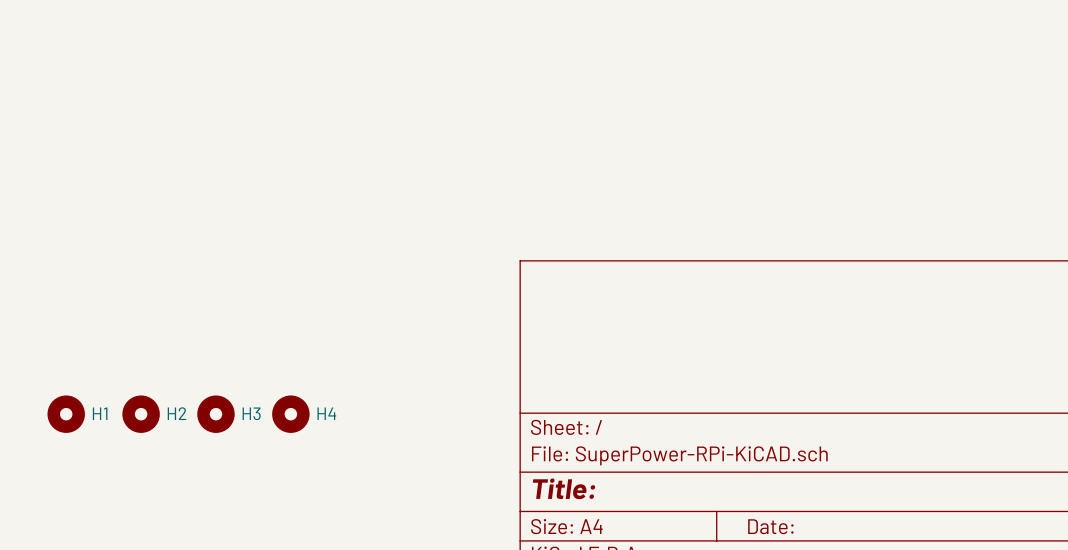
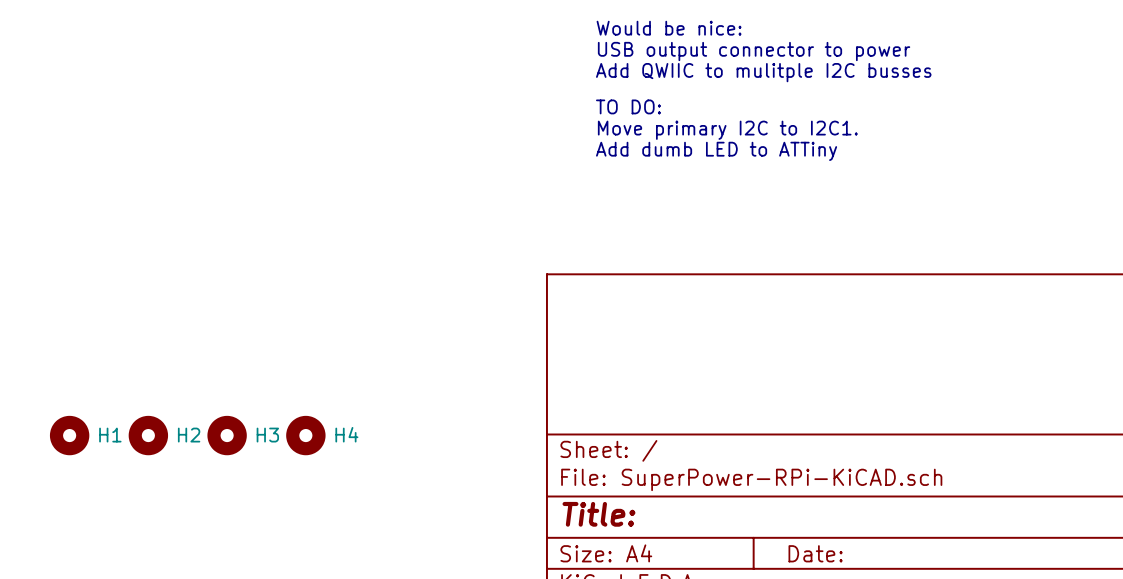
text: none -> Would be nice: (669, 28)
text: none -> USB output connector to power (754, 51)
text: none -> Add QWIIC to mulitple I2C busses (763, 72)
text: none -> TO DO: (628, 106)
text: none -> Move primary I2C to I2C1. (727, 130)
text: none -> Add dumb LED to ATTiny (716, 151)

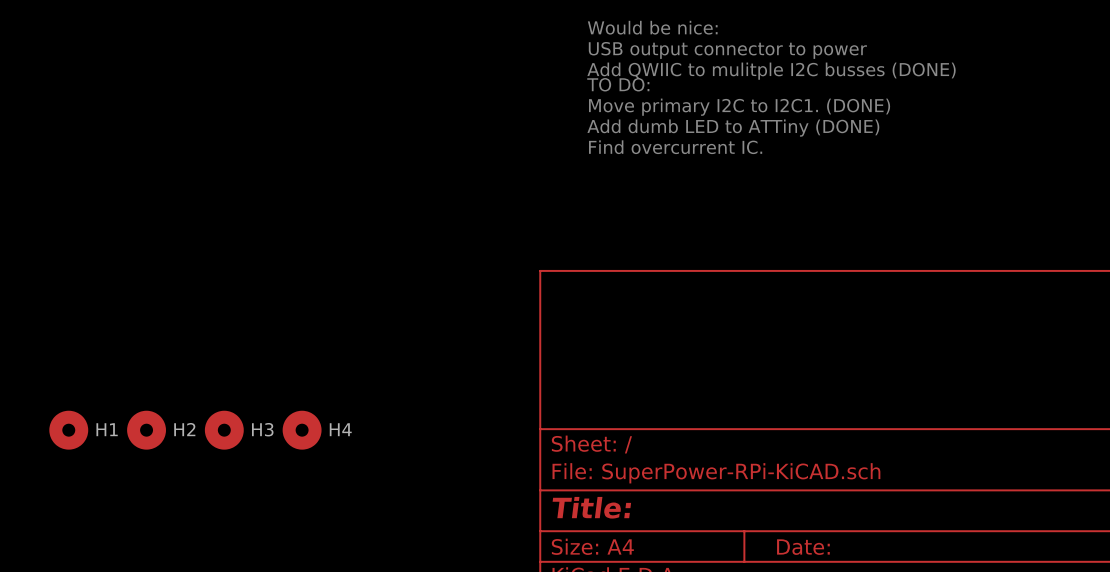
text: Add QWIIC to mulitple I2C busses (763, 72) -> Add QWIIC to mulitple I2C busses (DONE) (771, 71)
text: none -> TO DO: (618, 84)
text: TO DO: (628, 106) -> Move primary I2C to I2C1. (DONE) (739, 107)
text: Move primary I2C to I2C1. (727, 130) -> Add dumb LED to ATTiny (DONE) (733, 128)
text: Add dumb LED to ATTiny (716, 151) -> Find overcurrent IC. (675, 147)

